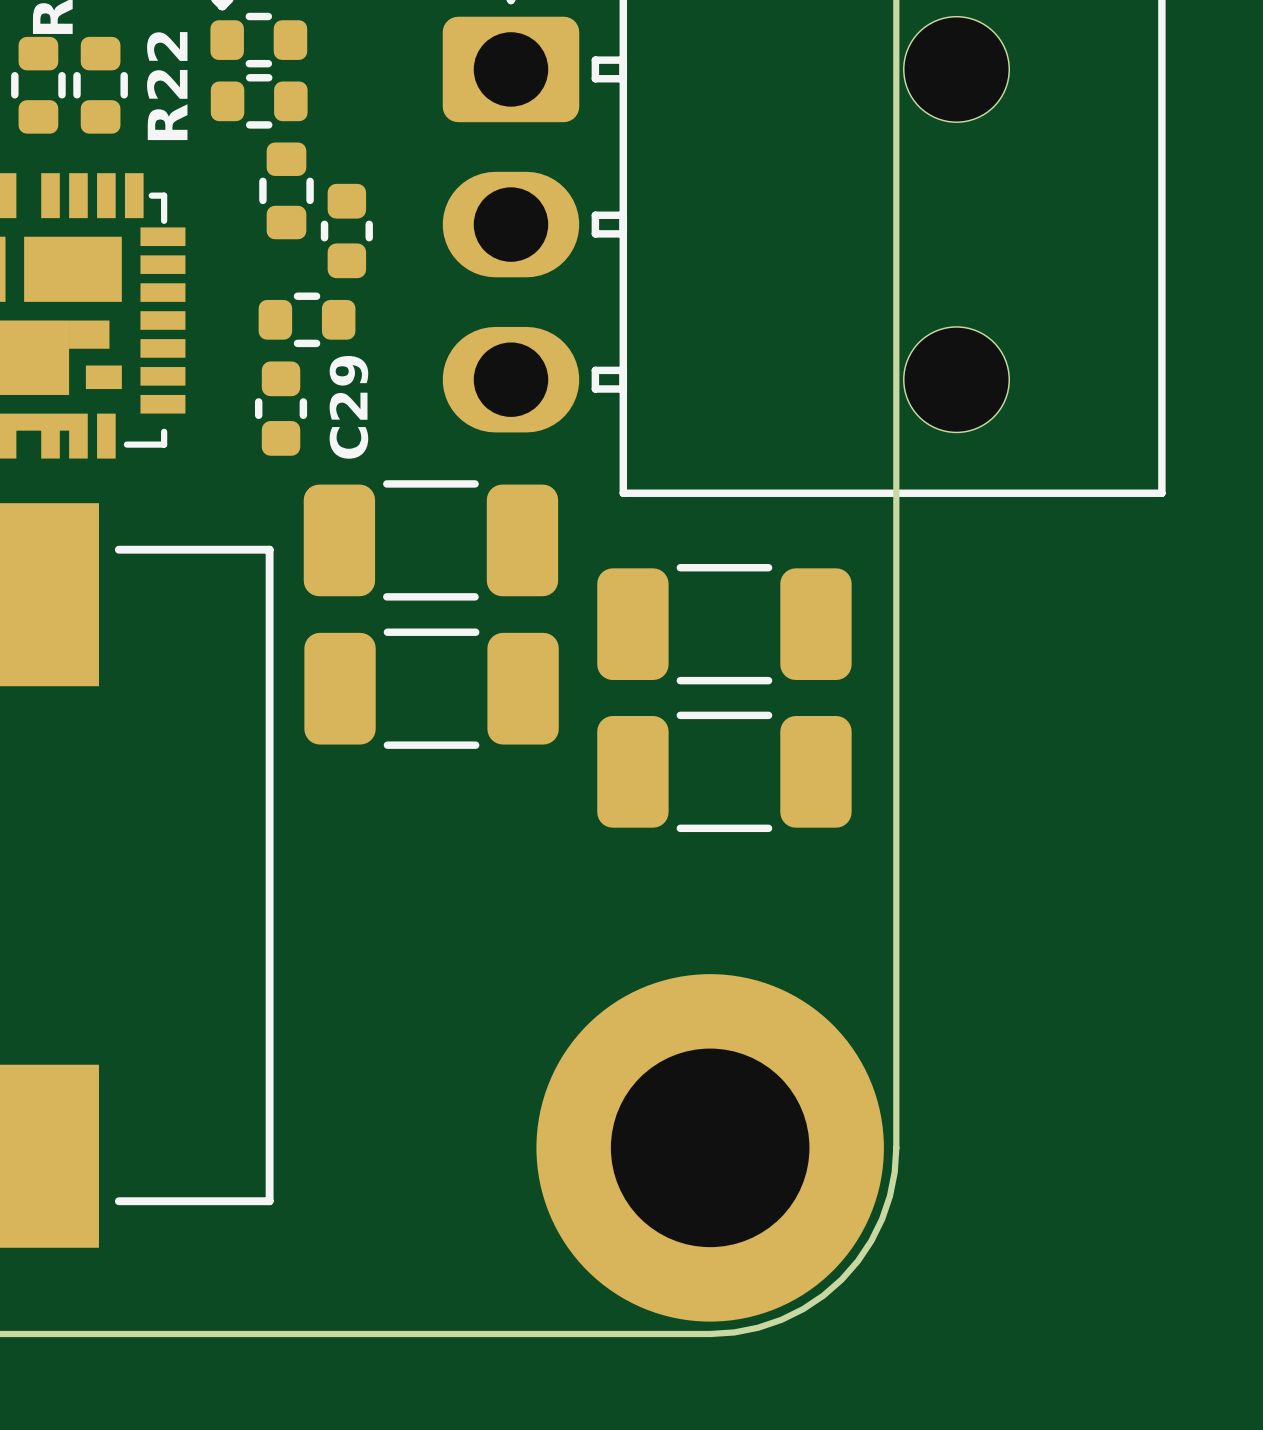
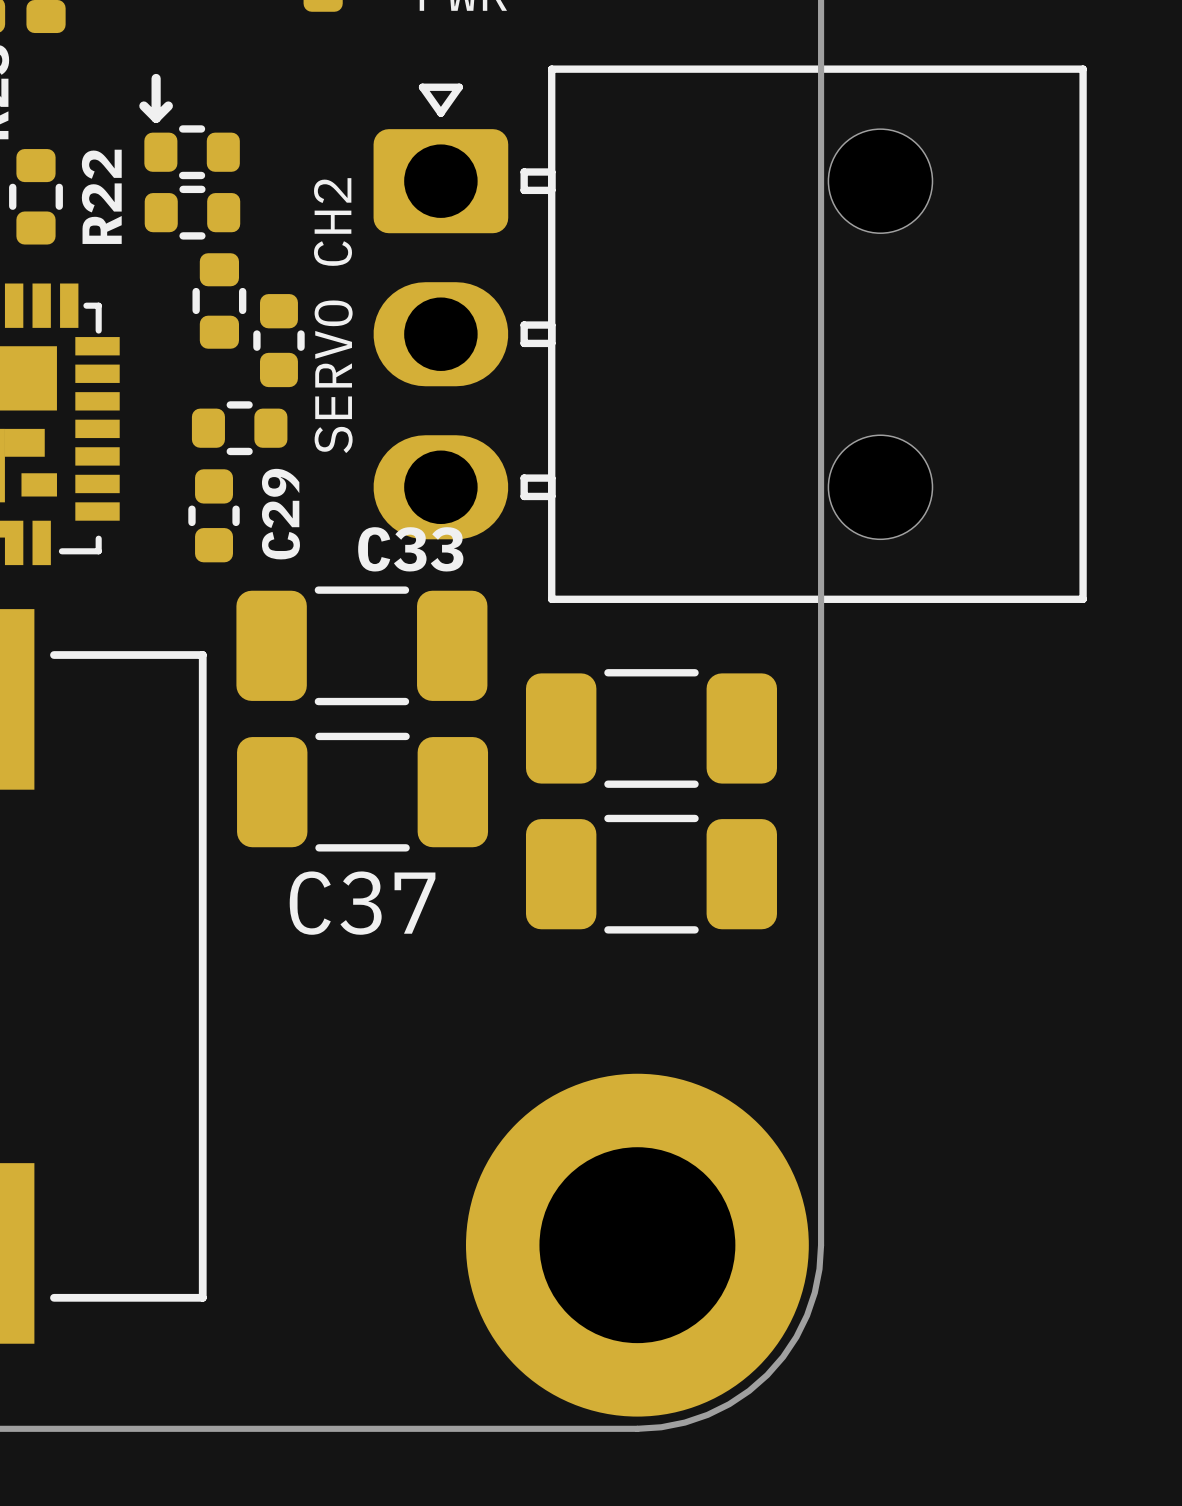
part text: none -> CH2 (333, 222)
part text: none -> SERVO (333, 376)
C33 name: none -> C33 (410, 549)
C37 name: none -> C37 (362, 903)

